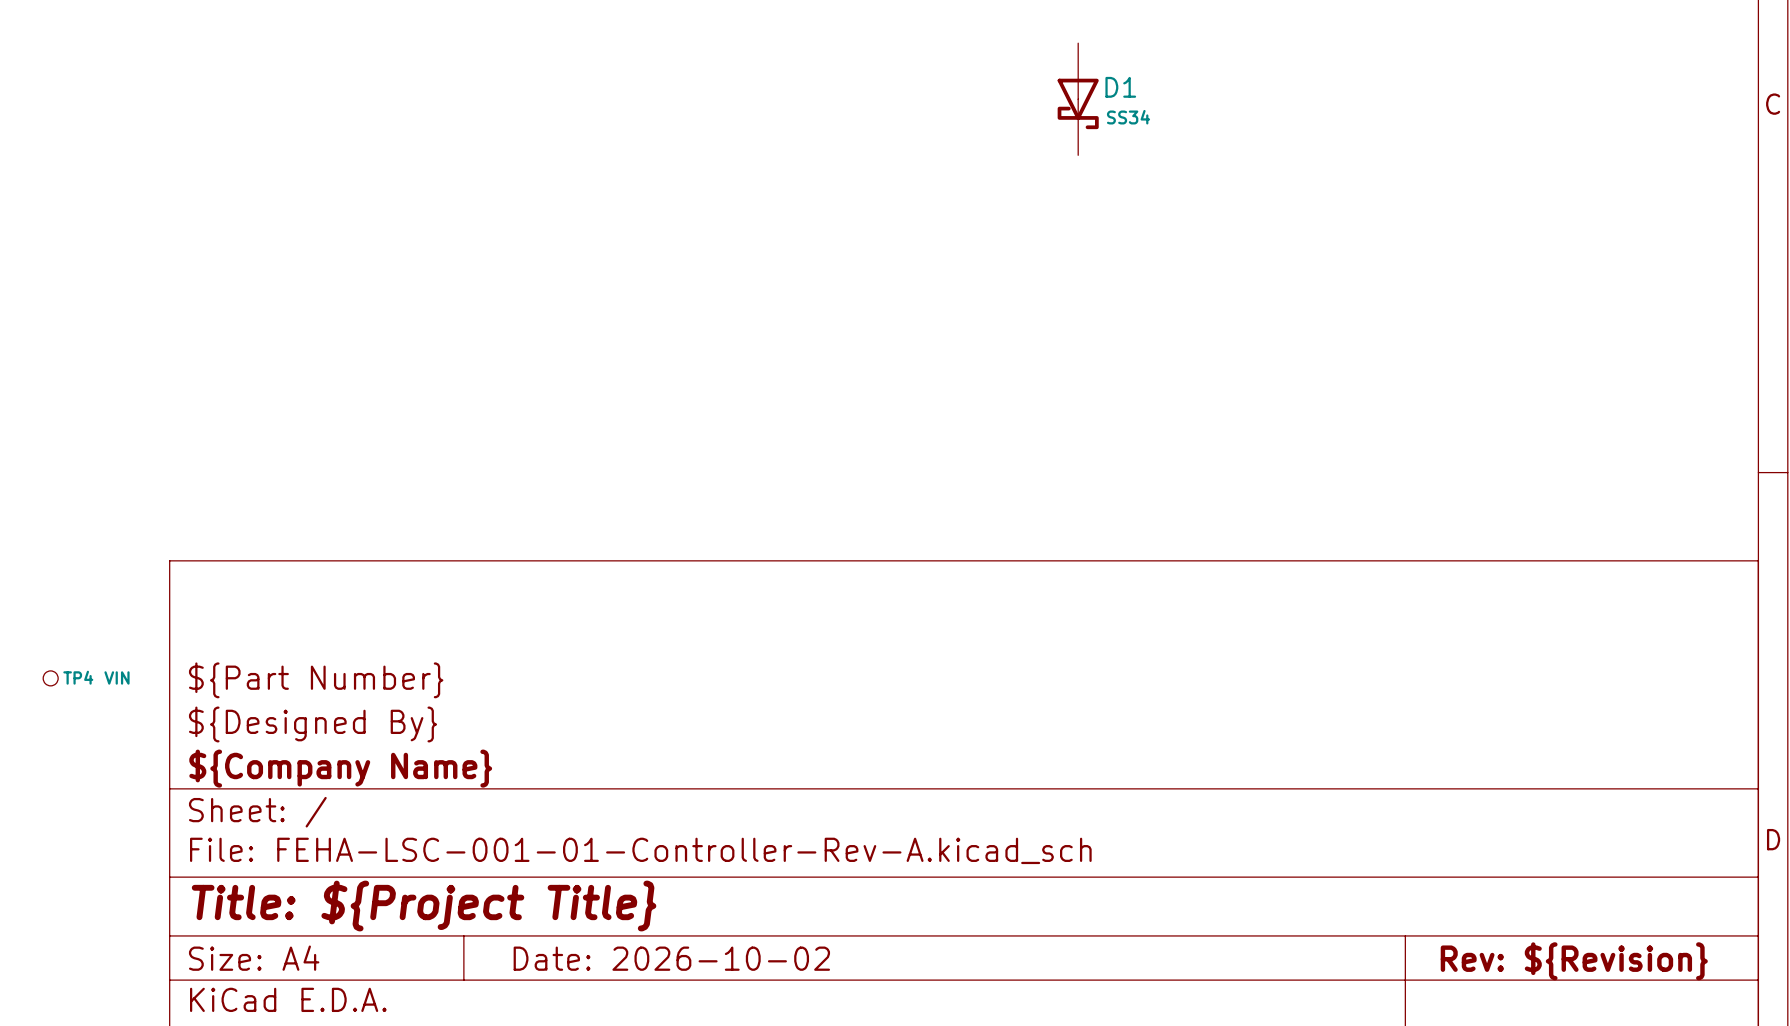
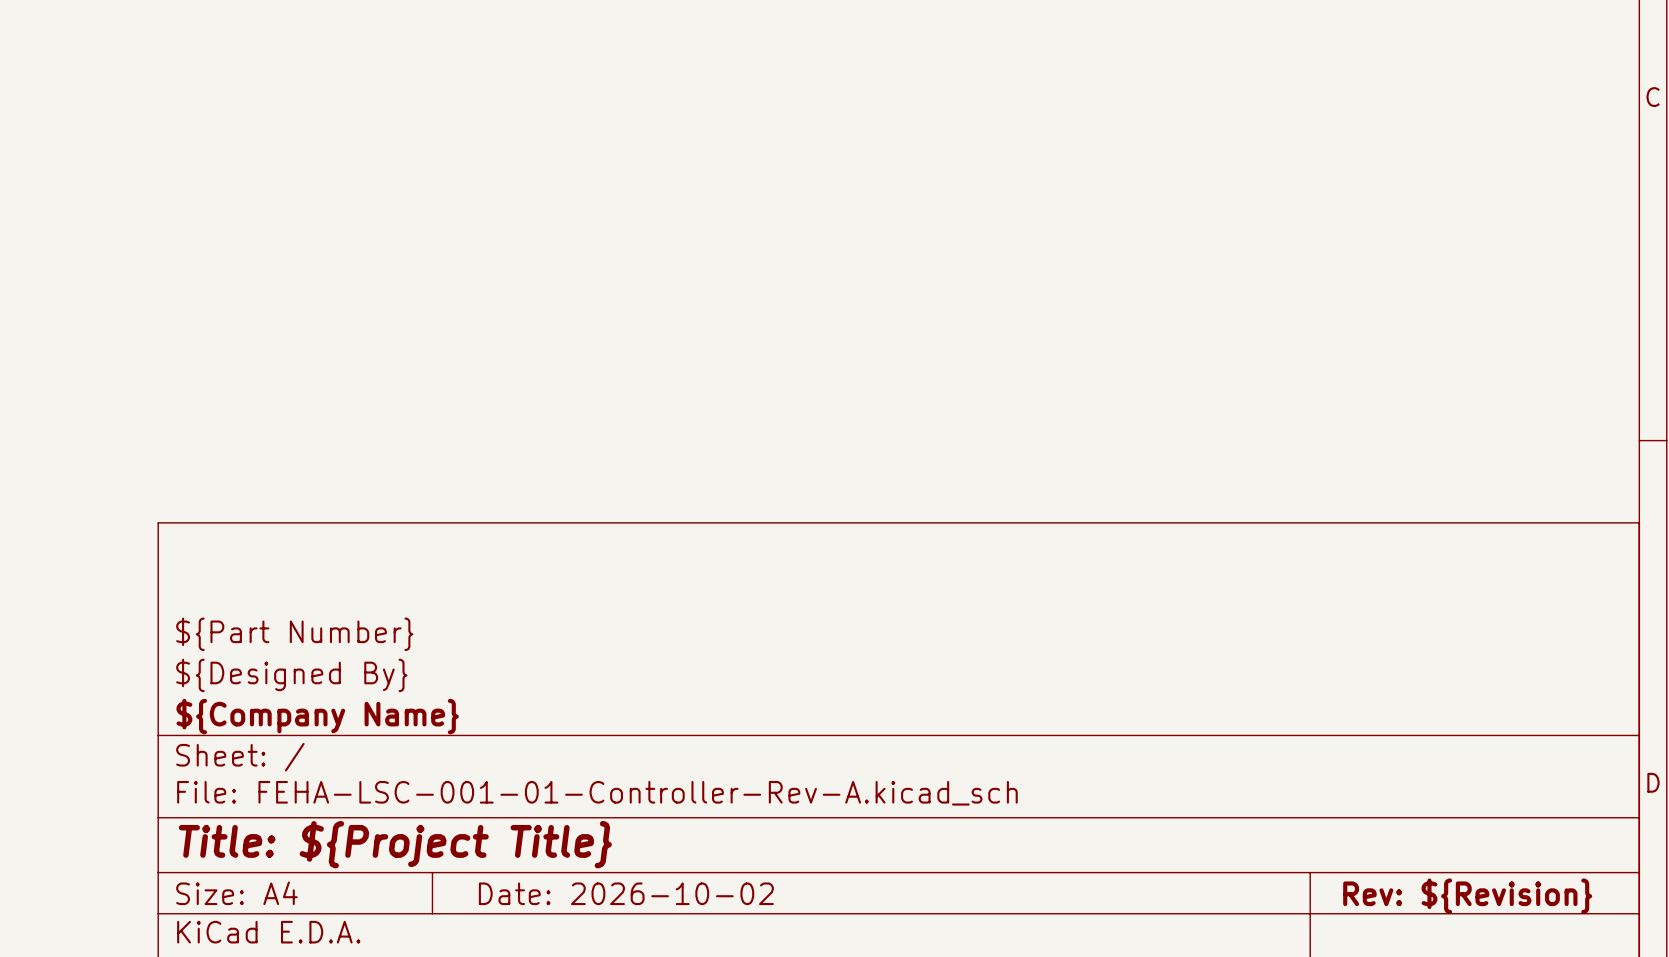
D1: SS34 (1078, 99) -> none
TP4: VIN (50, 678) -> none

